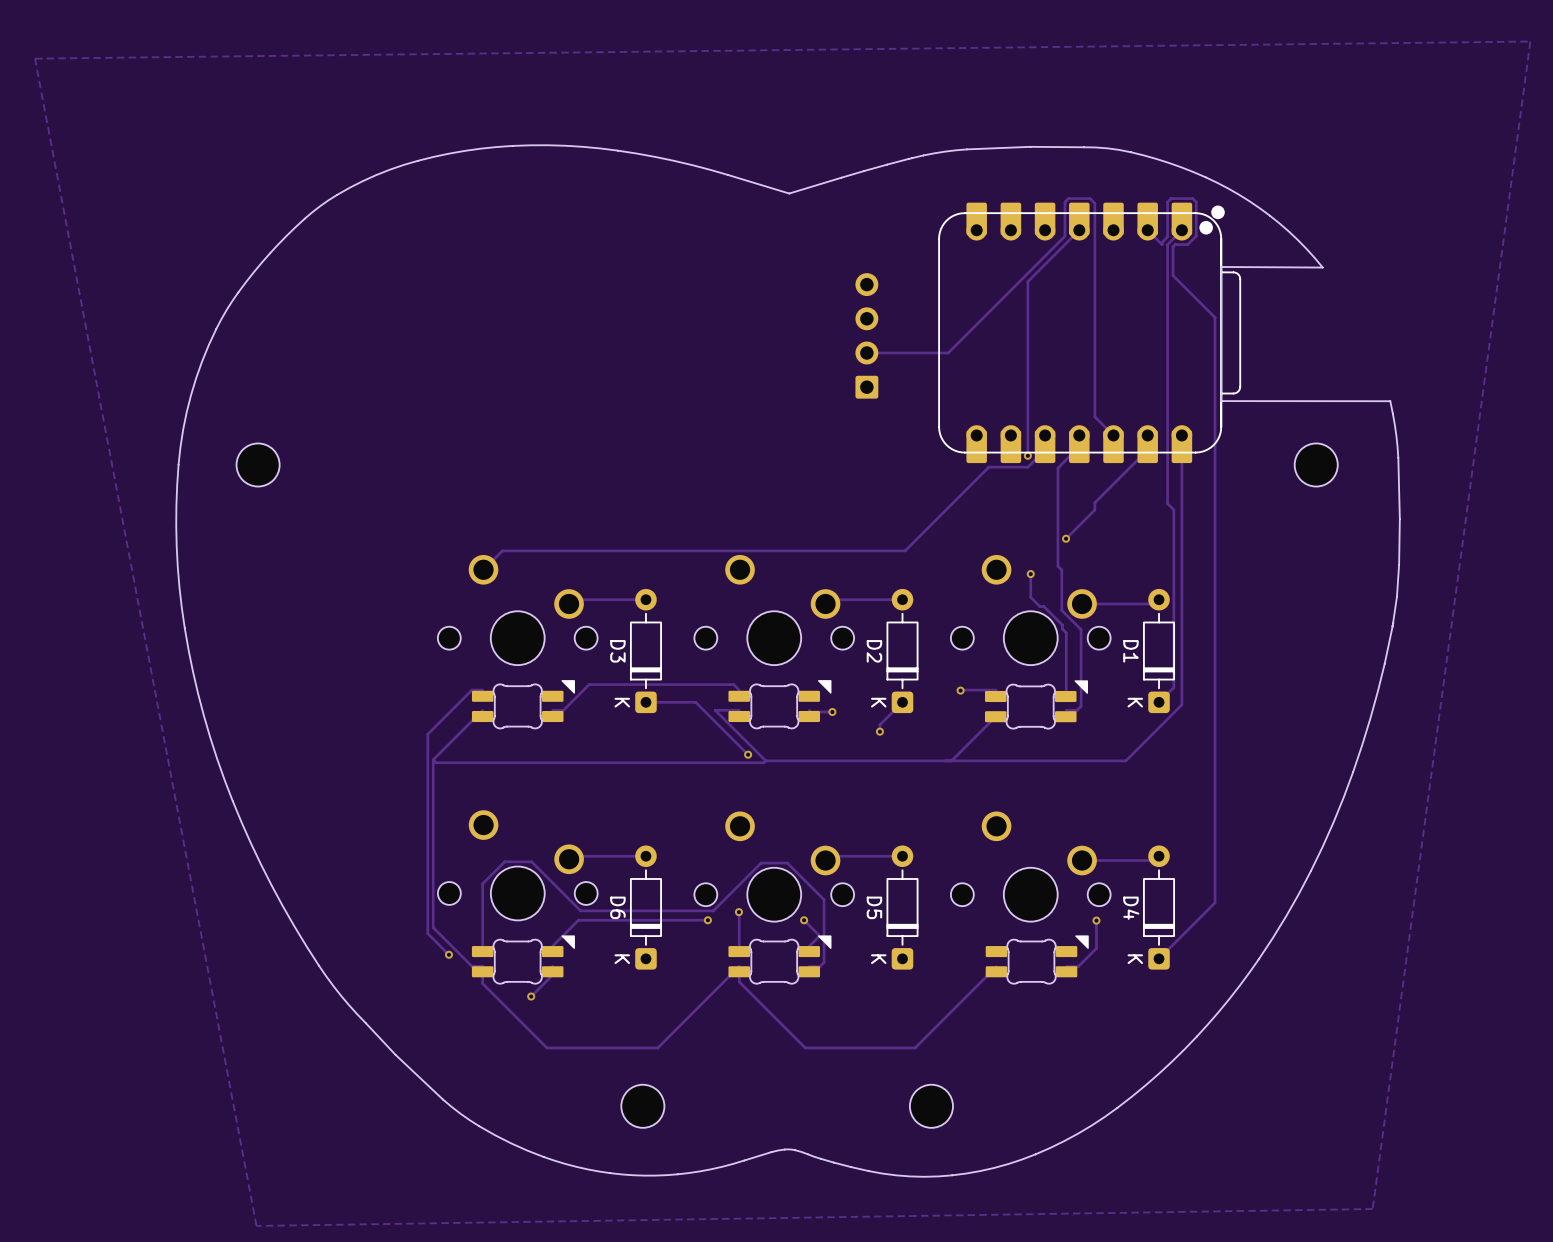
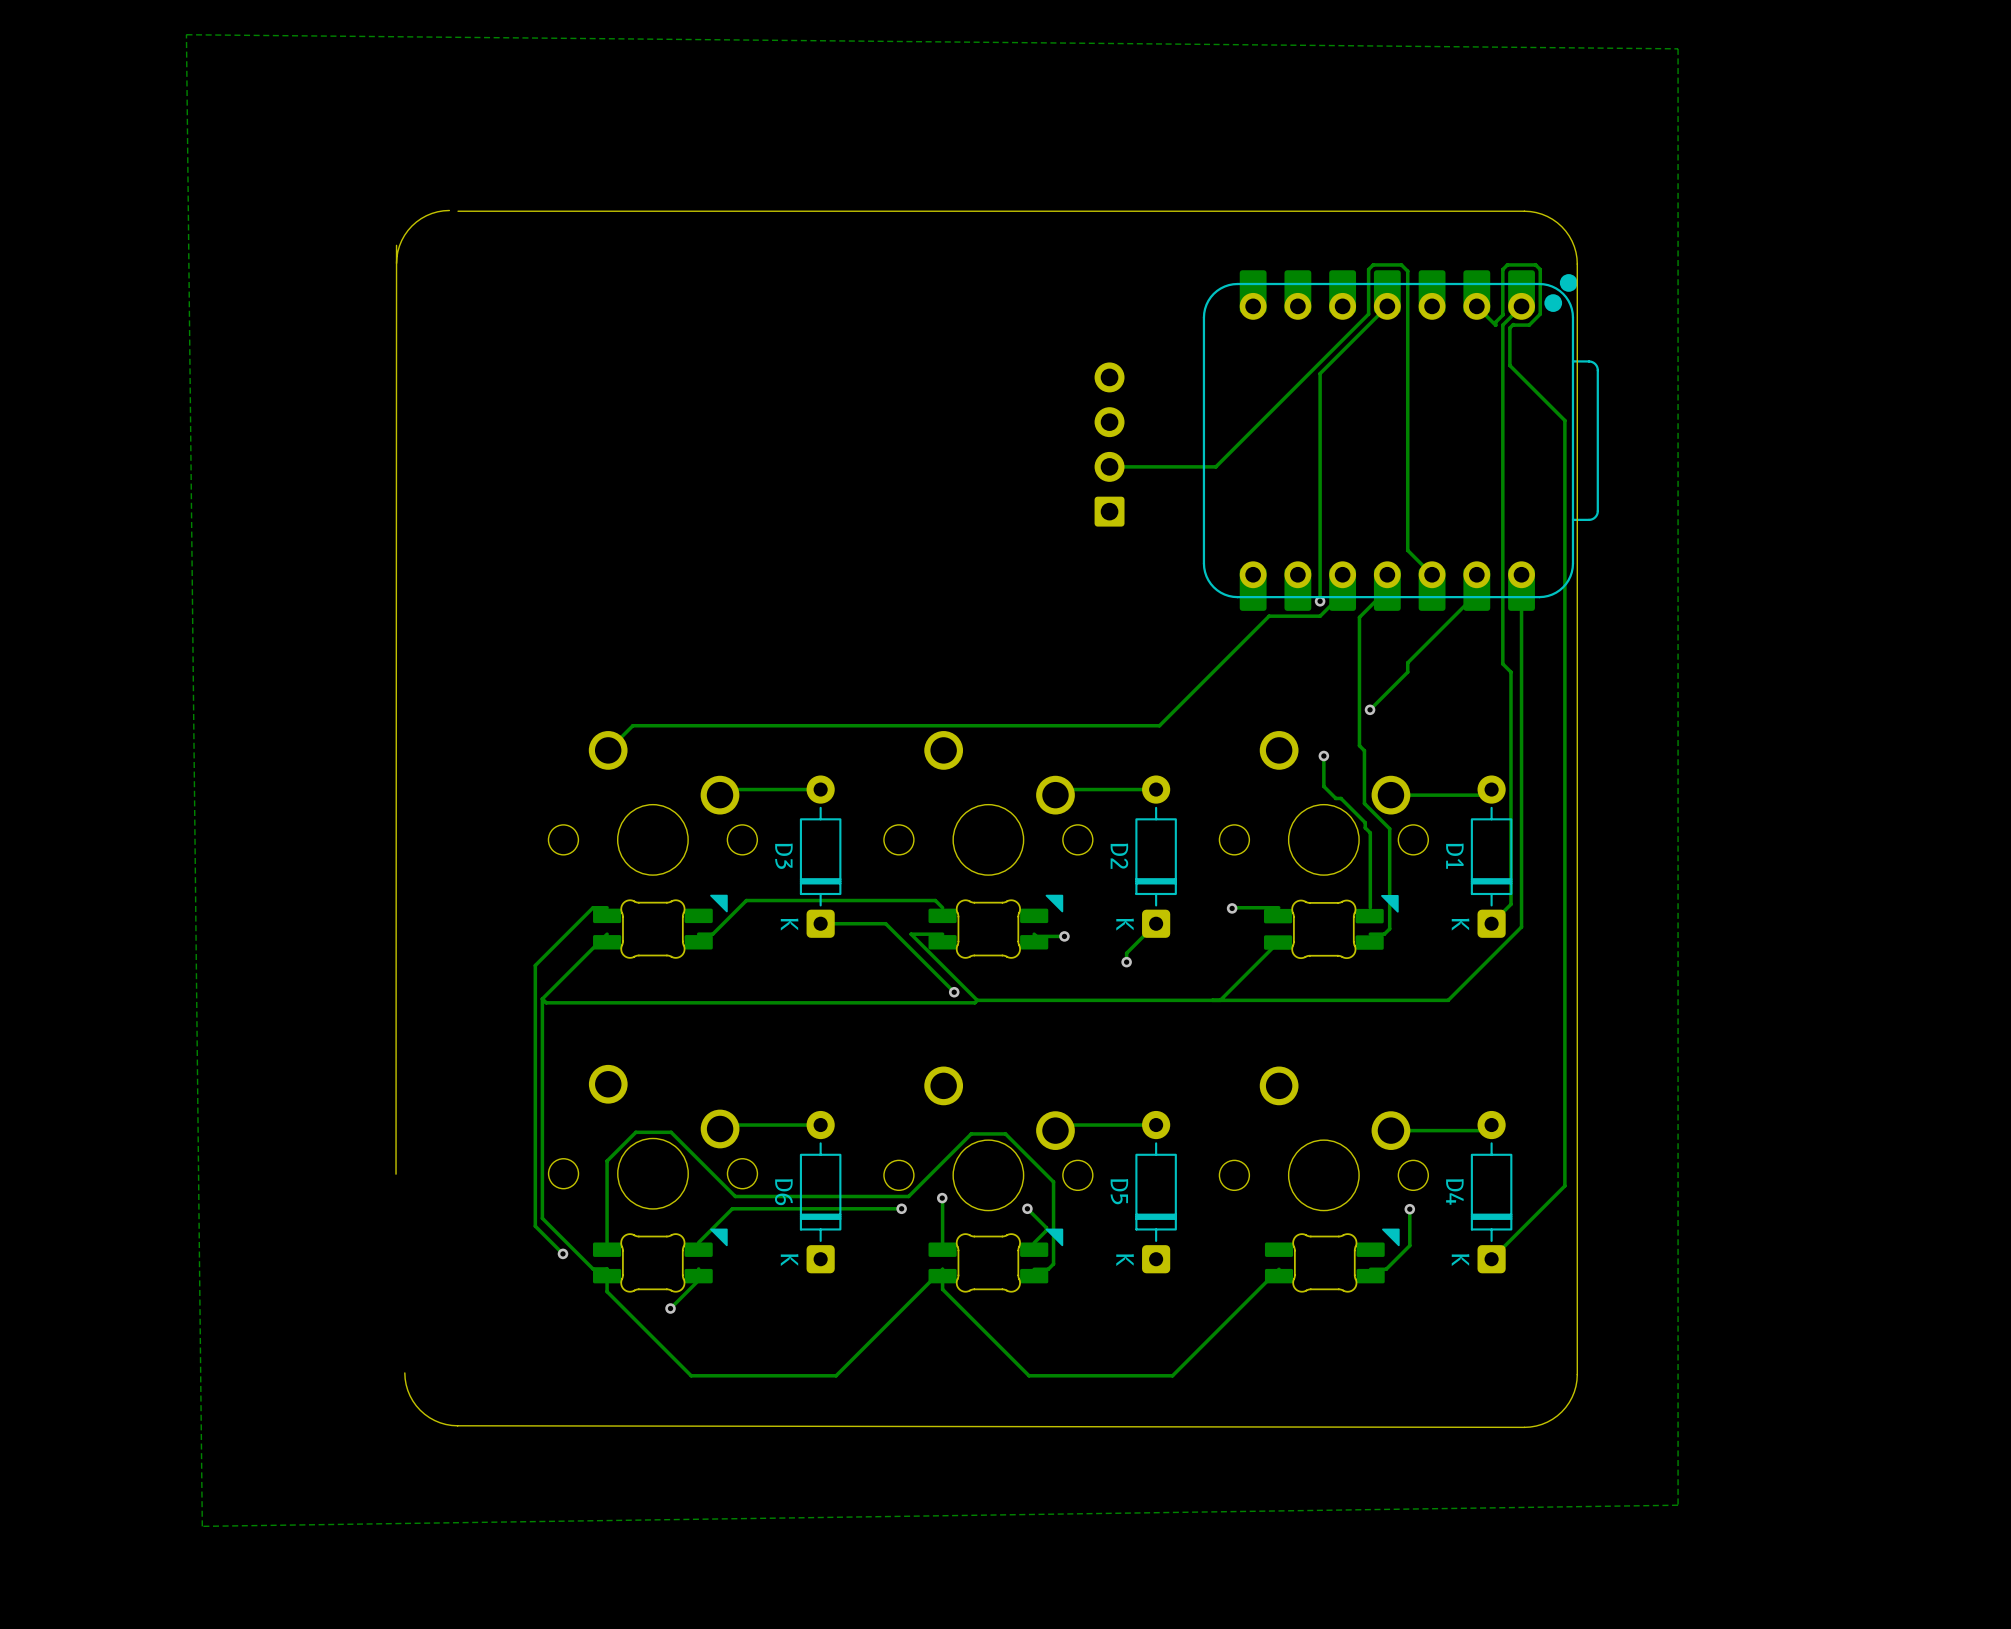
zone outline: (1530, 41) (1372, 1209) (256, 1225) (35, 58) (1530, 41) -> (186, 34) (1678, 48) (1678, 1505) (202, 1526) (186, 34)
board edge: none -> (449, 210) (426, 215) (412, 225) (399, 245) (396, 263)
board edge: none -> (458, 211) (1524, 211) (1541, 214) (1561, 226) (1574, 246) (1577, 264) (1577, 1374) (1574, 1391) (1561, 1411) (1547, 1422) (1524, 1427) (457, 1425)
board edge: none -> (396, 245) (396, 1174)
part: (258, 464) -> none
part: (1316, 464) -> none
board edge: (1393, 623) (1384, 664) (1377, 691) (1353, 772) (1322, 846) (1286, 916) (1249, 972) (1208, 1024) (1158, 1073) (1104, 1117) (1064, 1141) (1022, 1159) (980, 1171) (952, 1175) (910, 1176) (882, 1173) (787, 1149) (722, 1166) (689, 1173) (644, 1175) (599, 1171) (565, 1163) (527, 1150) (479, 1126) (451, 1106) (395, 1054) (340, 995) (318, 965) (282, 905) (251, 843) (224, 780) (210, 737) (193, 672) (181, 607) (176, 546) (177, 485) (183, 429) (196, 378) (216, 328) (232, 301) (261, 262) (295, 227) (328, 200) (363, 181) (403, 164) (449, 153) (496, 147) (547, 145) (582, 146) (617, 150) (673, 160) (789, 193) (887, 164) (945, 151) (1030, 146) (1095, 147) (1119, 149) (1181, 167) (1238, 194) (1288, 231) (1322, 267) (1221, 266) (1221, 401) (1390, 401) (1397, 446) (1399, 519) (1396, 596) (1392, 626) -> none
board edge: none -> (404, 1372) (410, 1395) (420, 1410) (440, 1422) (457, 1425)
part: (642, 1106) -> none
part: (931, 1106) -> none

